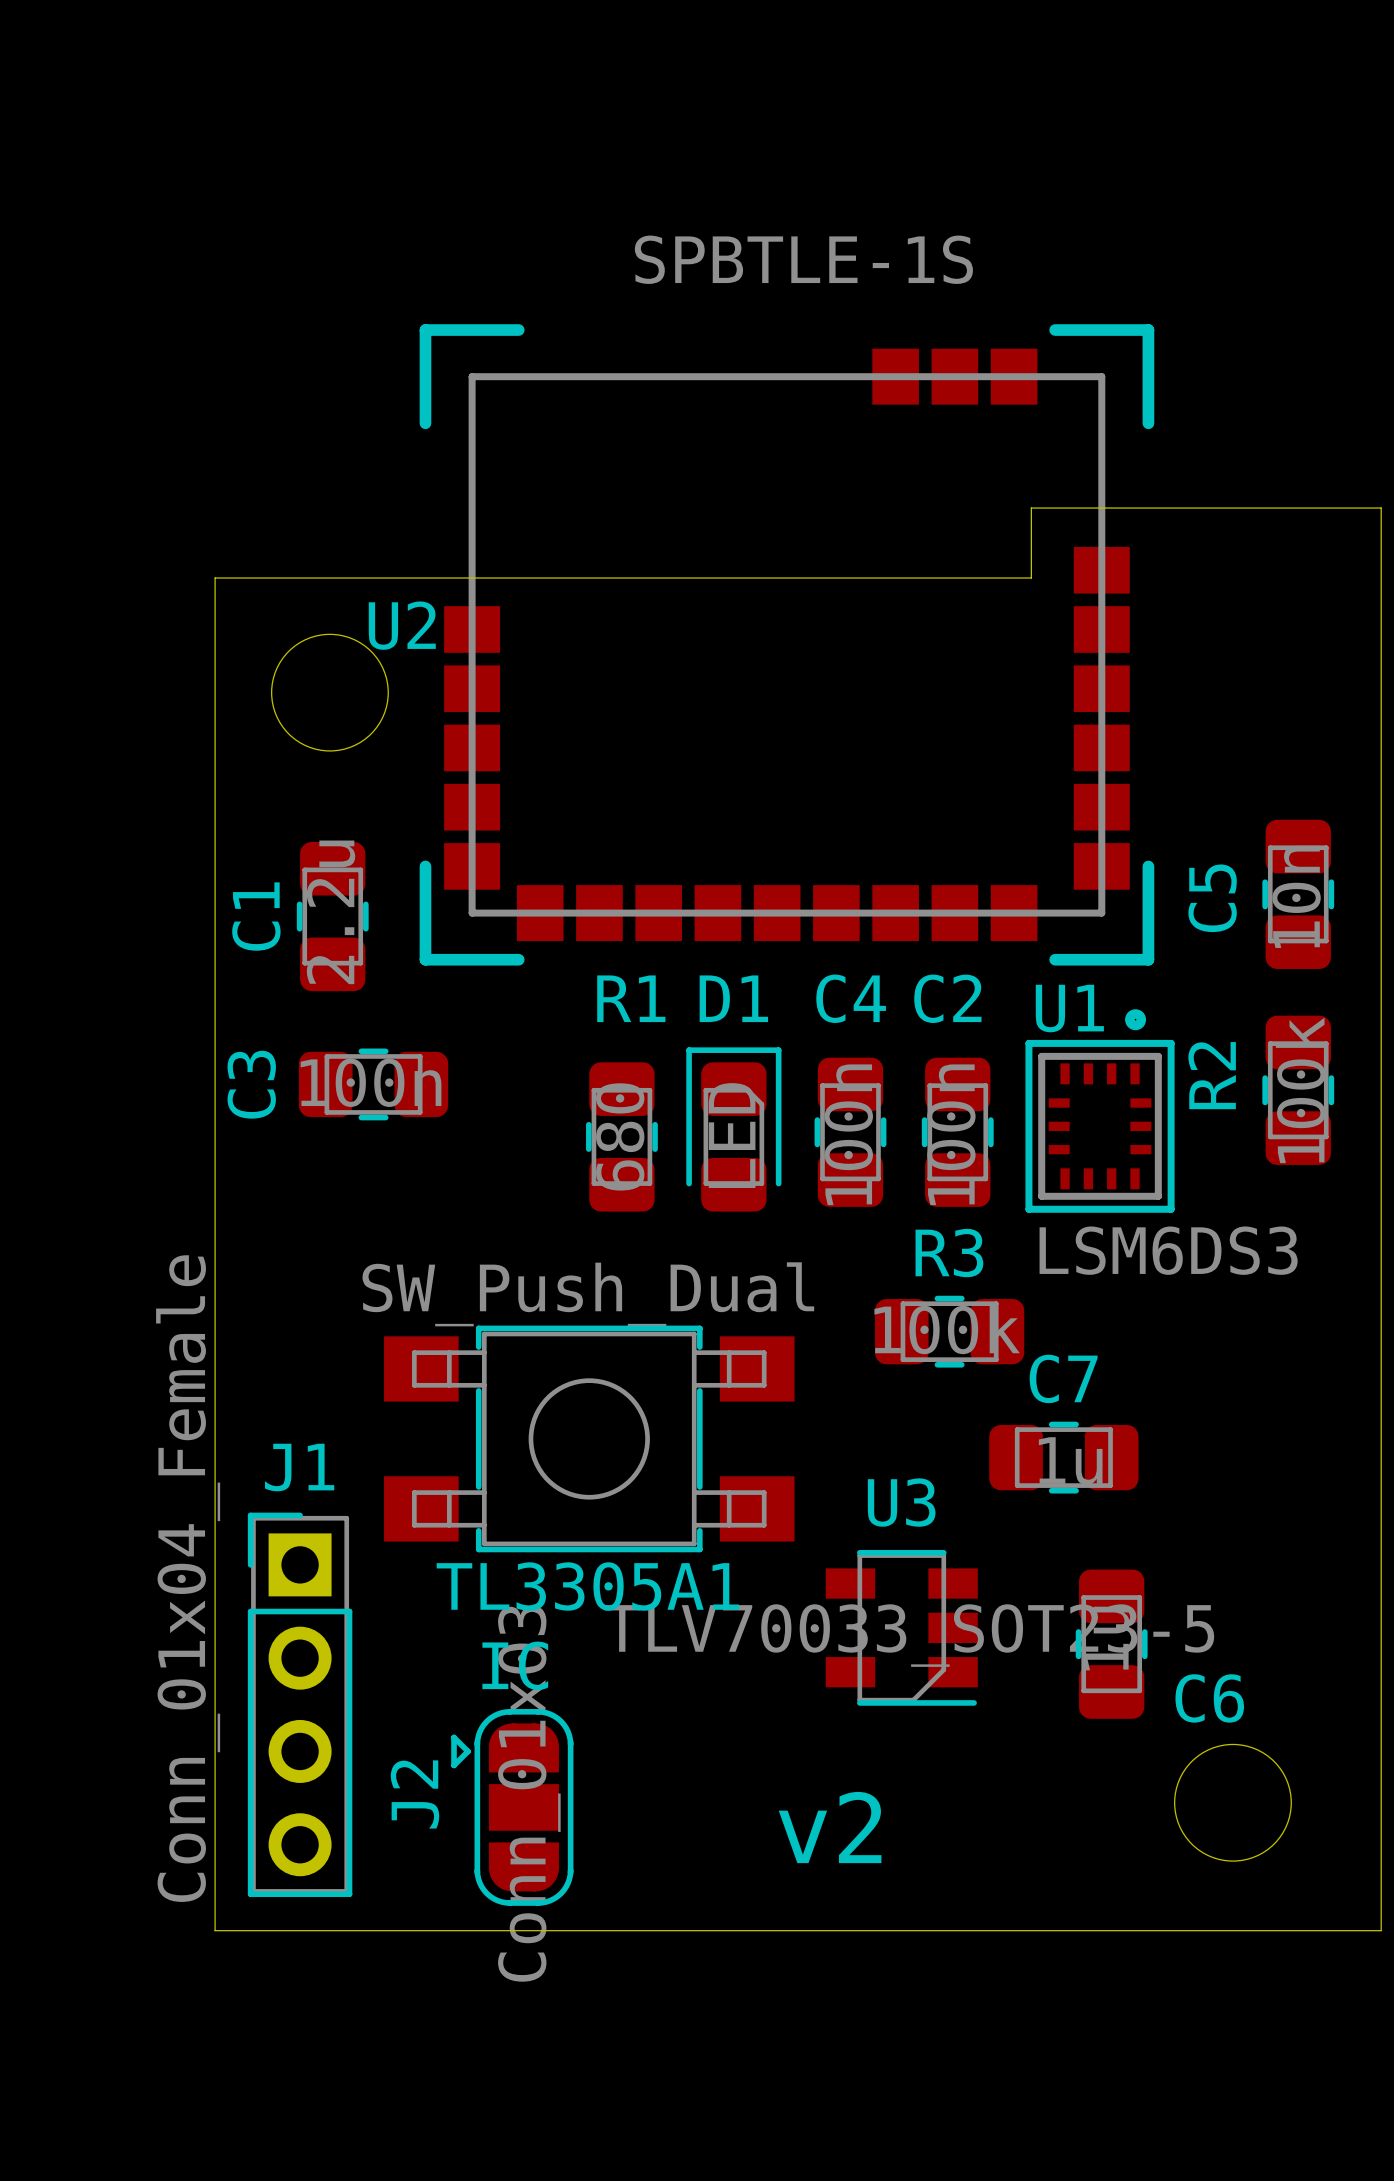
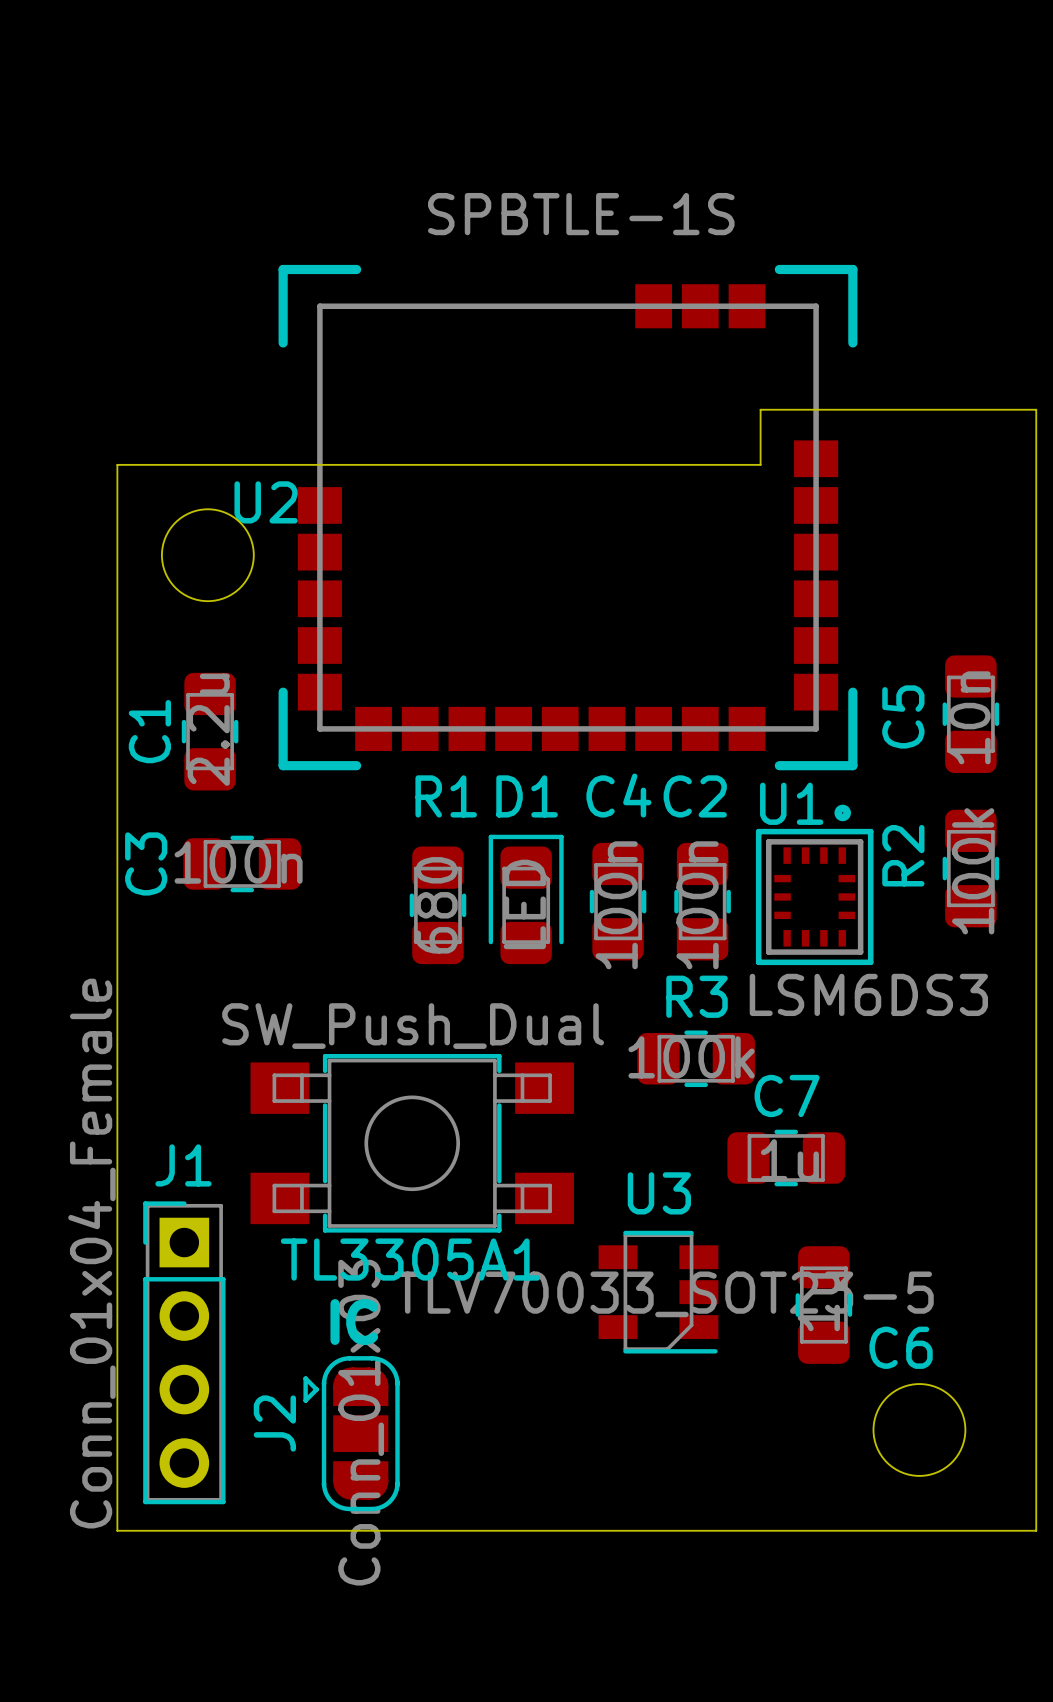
text: v2 (830, 1827) -> none

